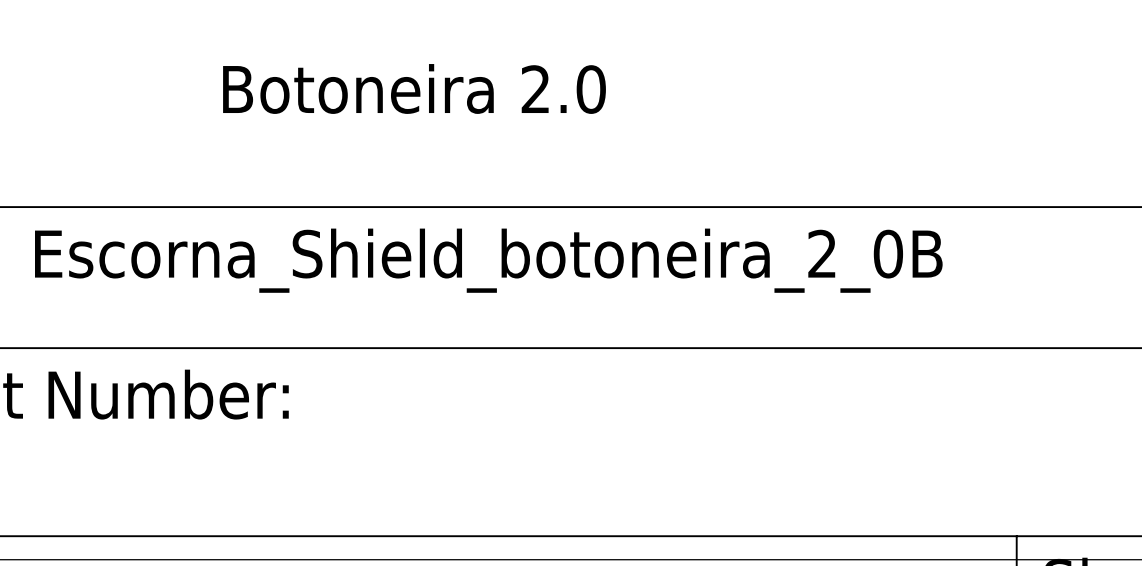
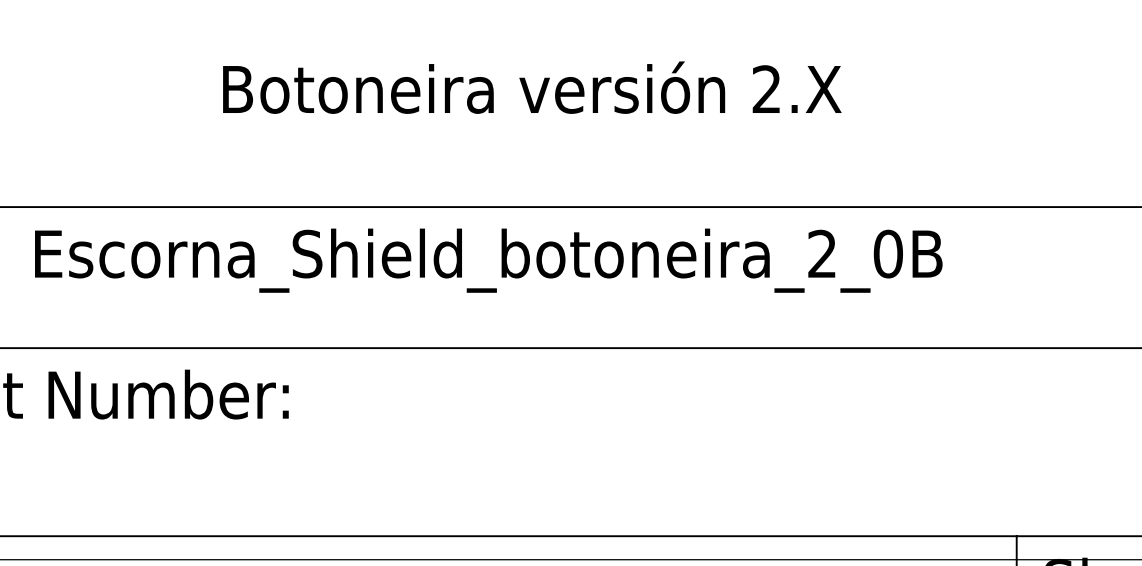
text: Botoneira 2.0 (414, 88) -> Botoneira versión 2.X (532, 87)

